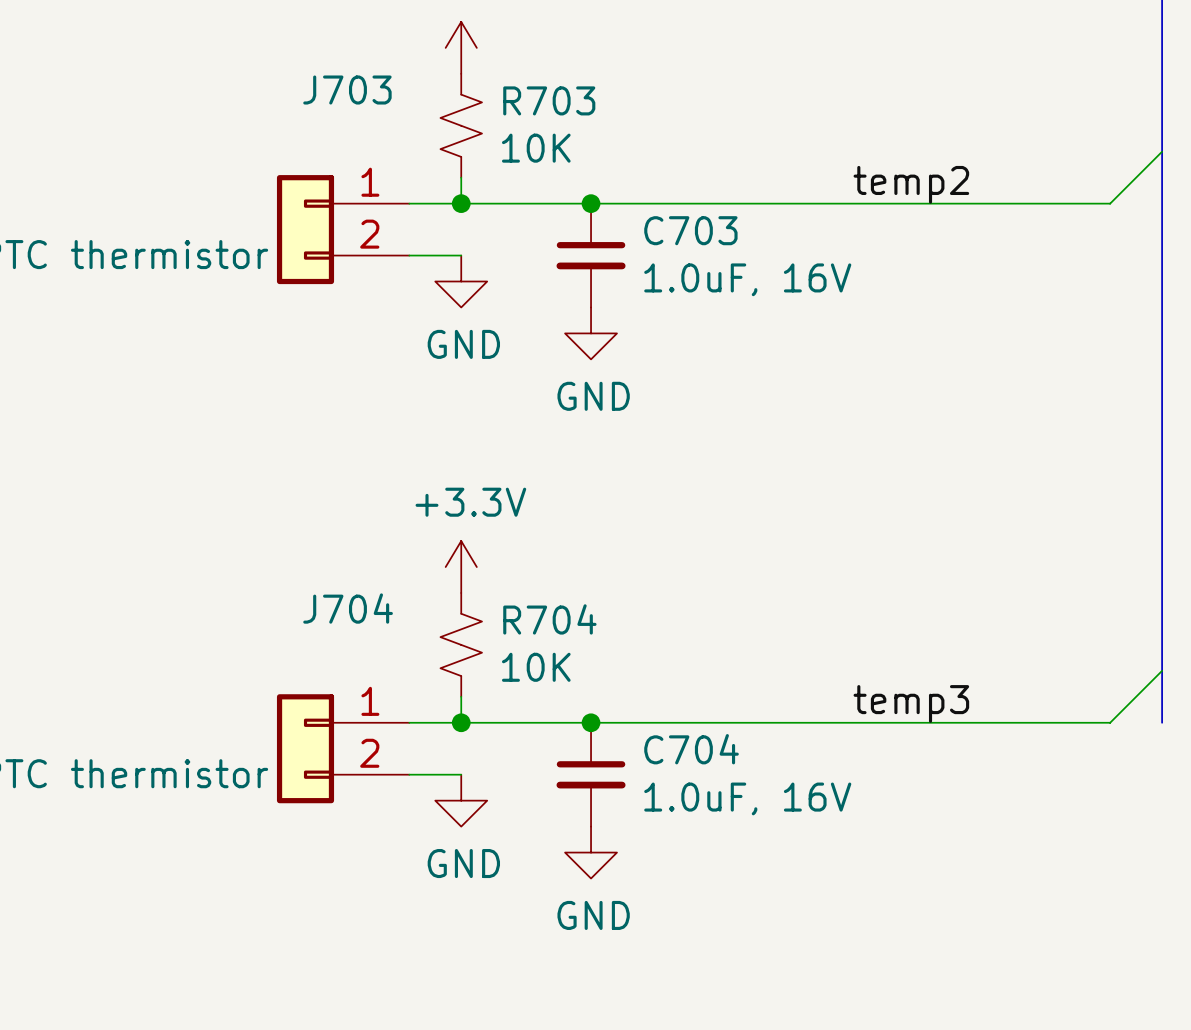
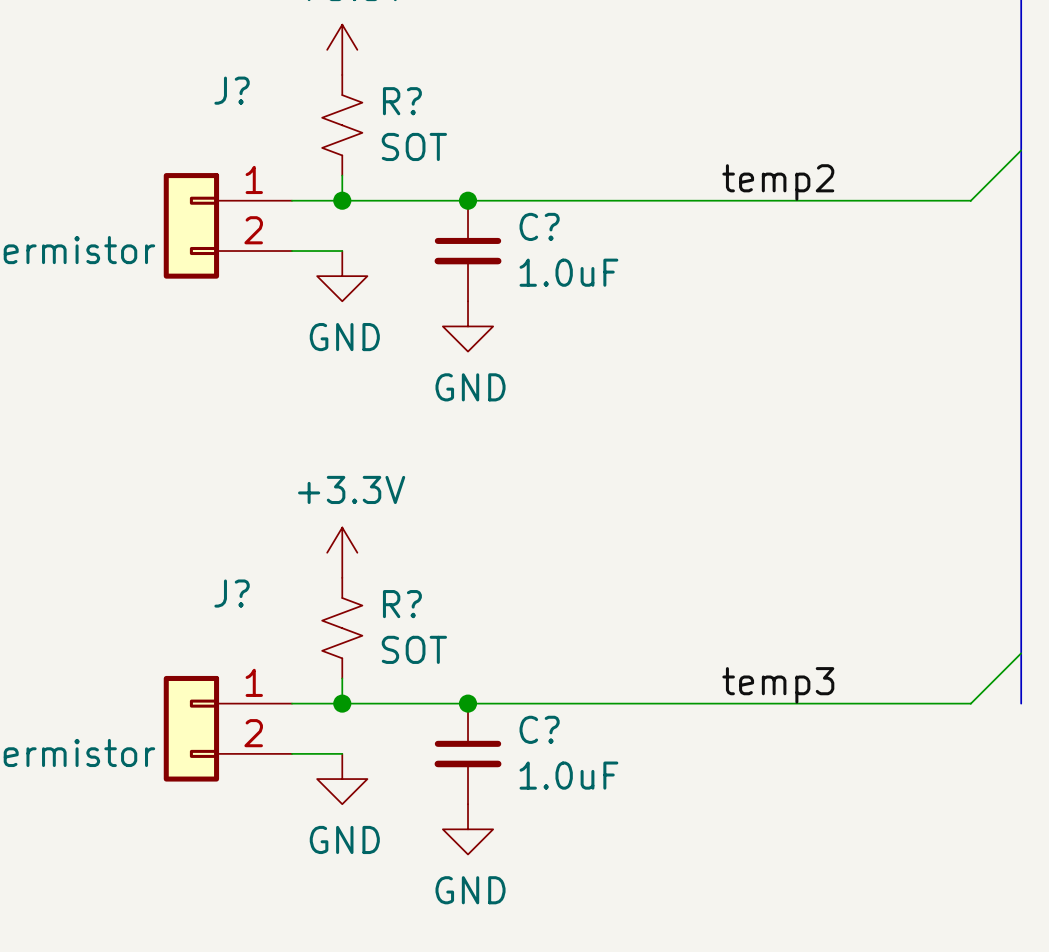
J703 name: J703 (347, 90) -> J? (232, 90)
R703 name: R703 (549, 100) -> R? (402, 101)
R703 value: 10K (536, 148) -> SOT (414, 146)
C703 name: C703 (690, 230) -> C? (539, 226)
C703 value: 1.0uF, 16V (747, 279) -> 1.0uF (568, 272)
J704 name: J704 (348, 608) -> J? (232, 593)
R704 name: R704 (549, 619) -> R? (402, 604)
R704 value: 10K (536, 667) -> SOT (414, 649)
C704 name: C704 (691, 749) -> C? (539, 729)
C704 value: 1.0uF, 16V (747, 798) -> 1.0uF (568, 775)

